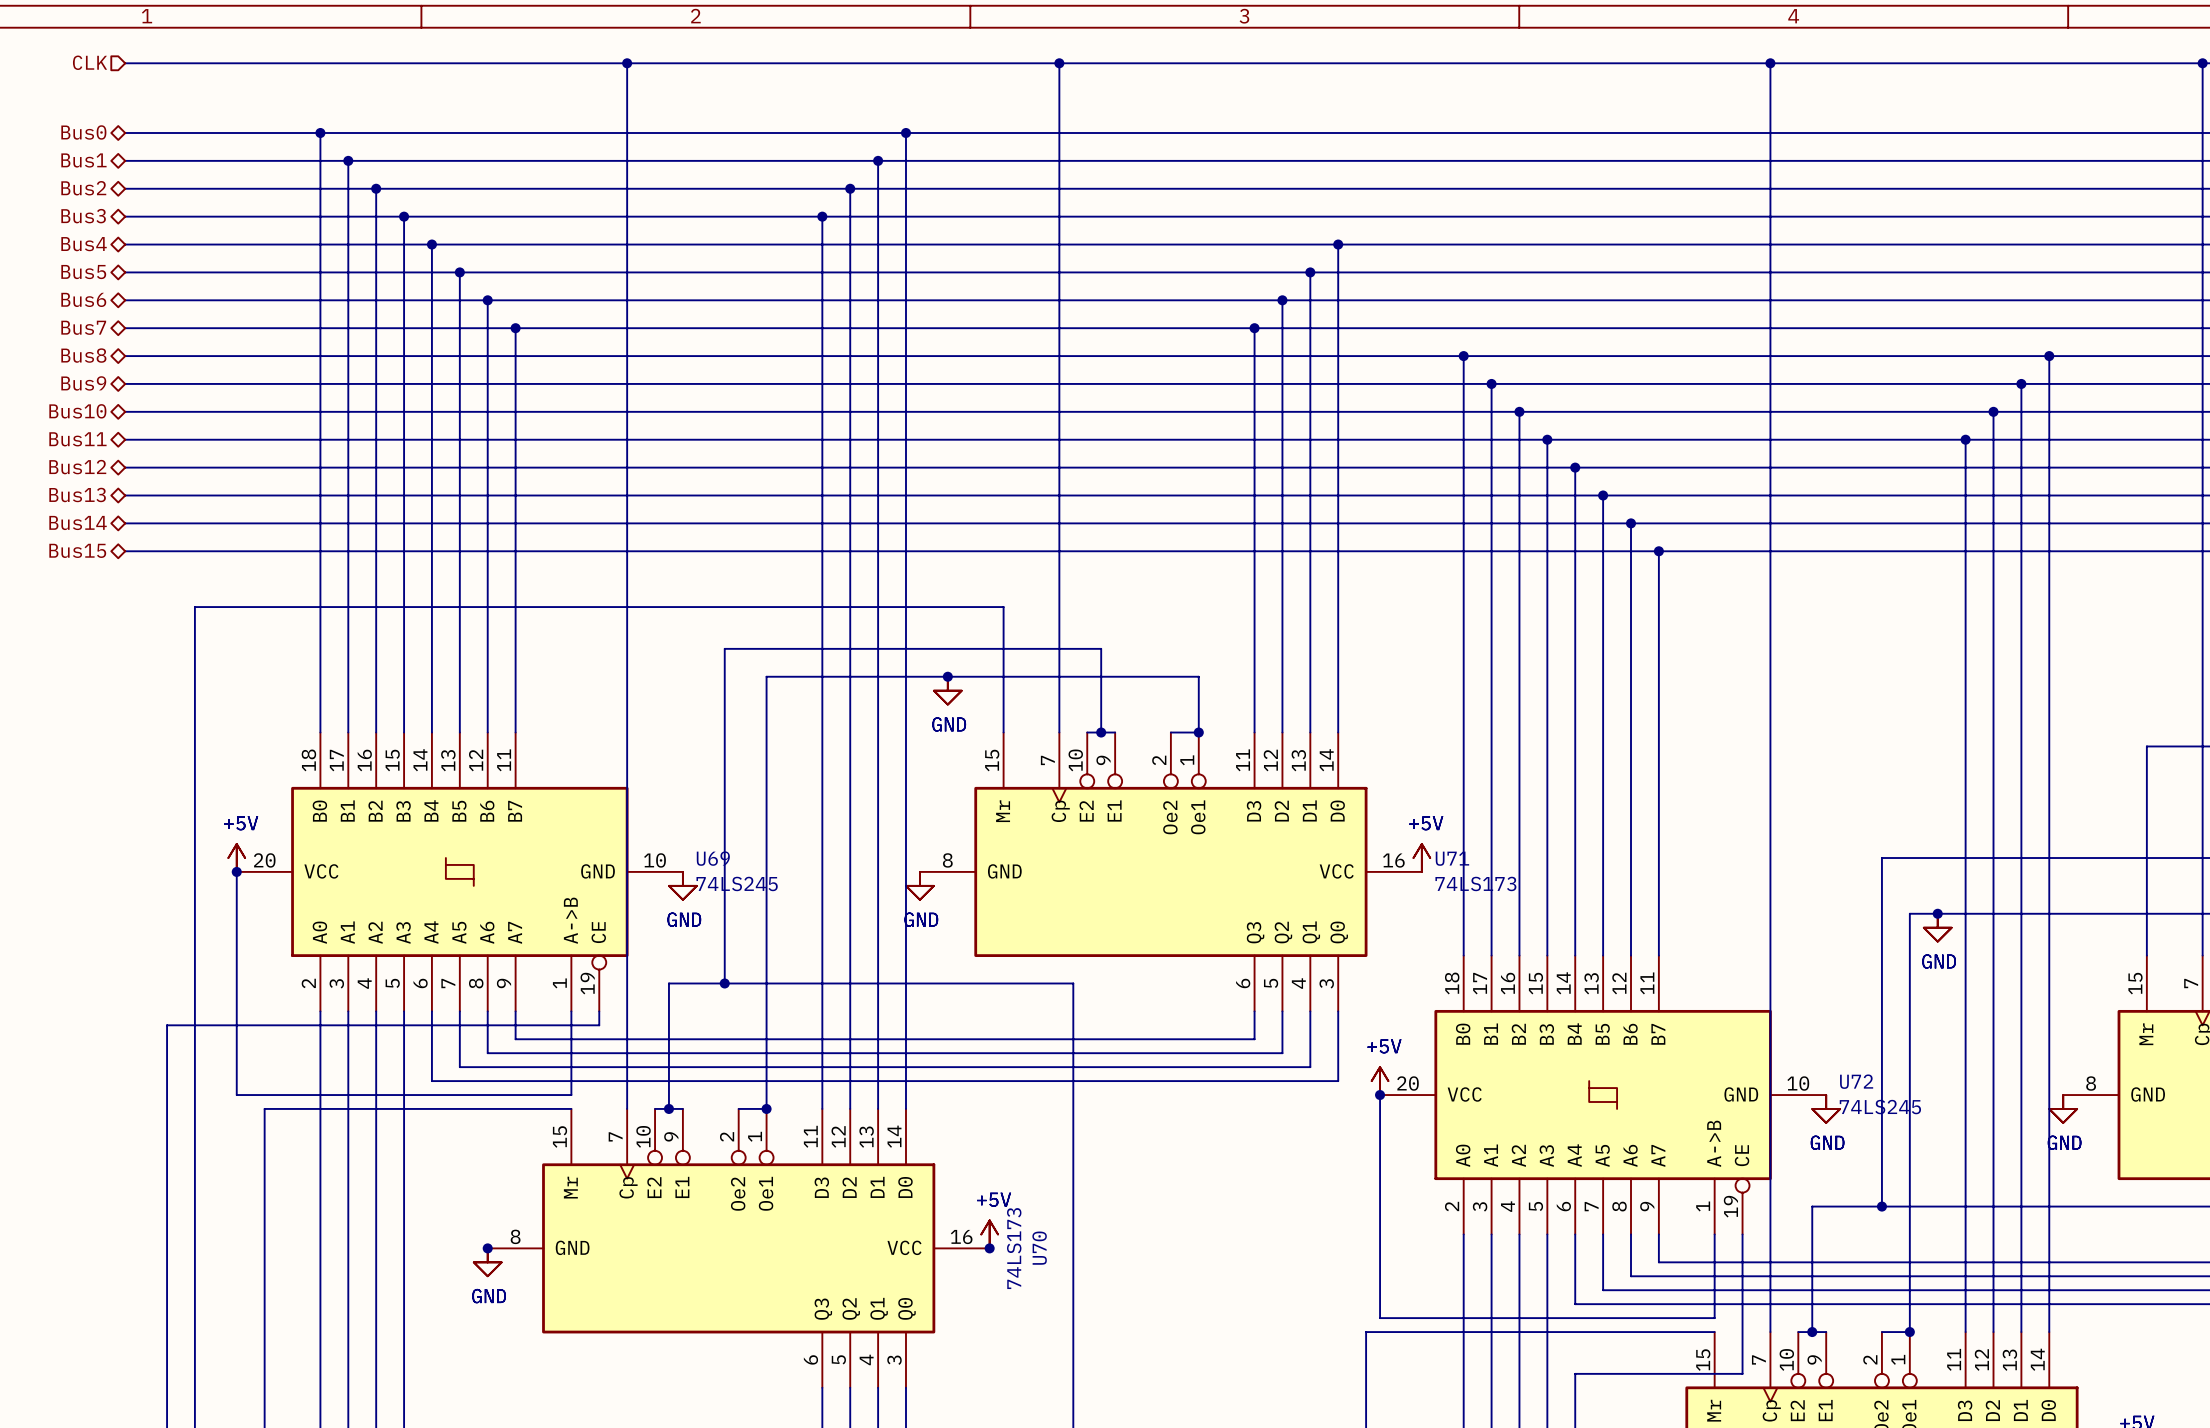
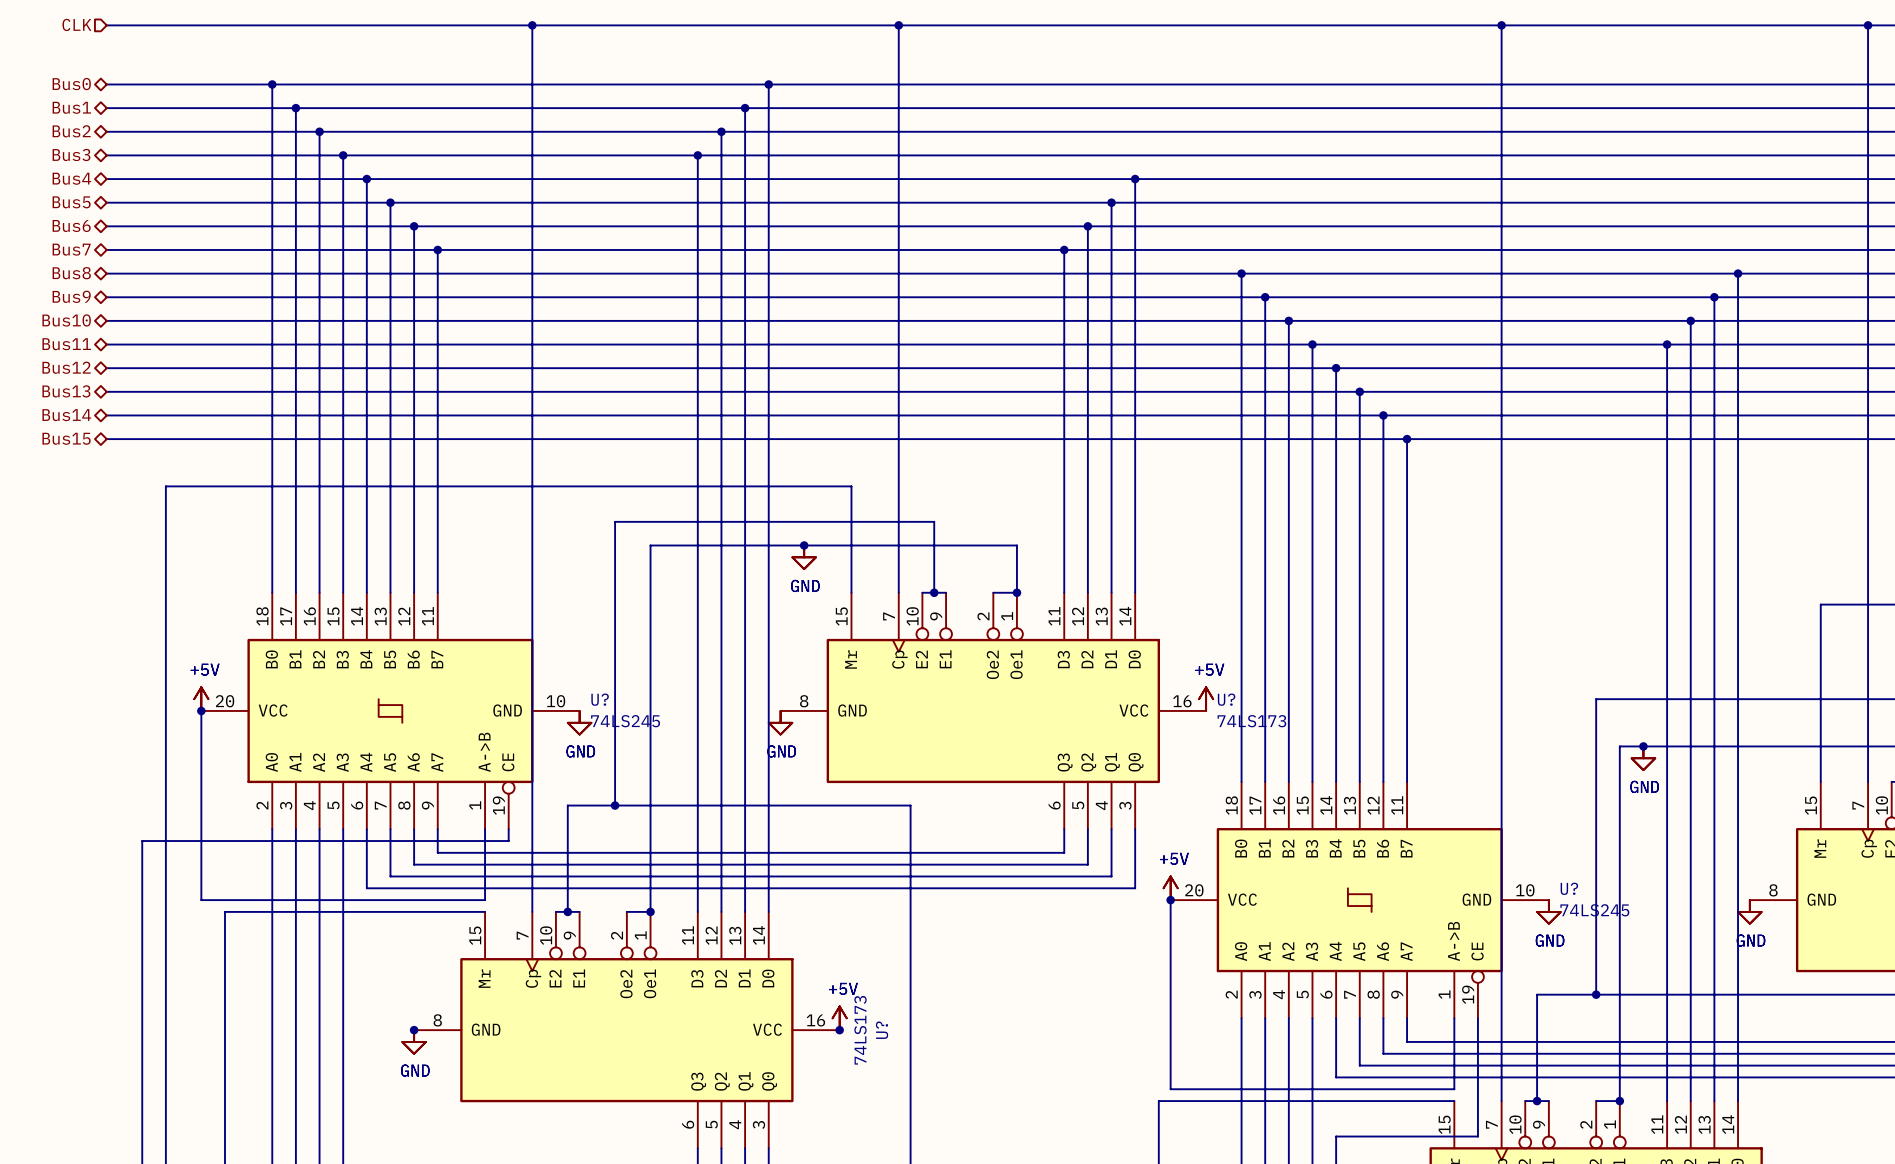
U69 name: U69 (713, 858) -> U? (600, 699)
U71 name: U71 (1452, 858) -> U? (1226, 699)
U72 name: U72 (1856, 1081) -> U? (1569, 888)
U70 name: U70 (1039, 1248) -> U? (882, 1030)

